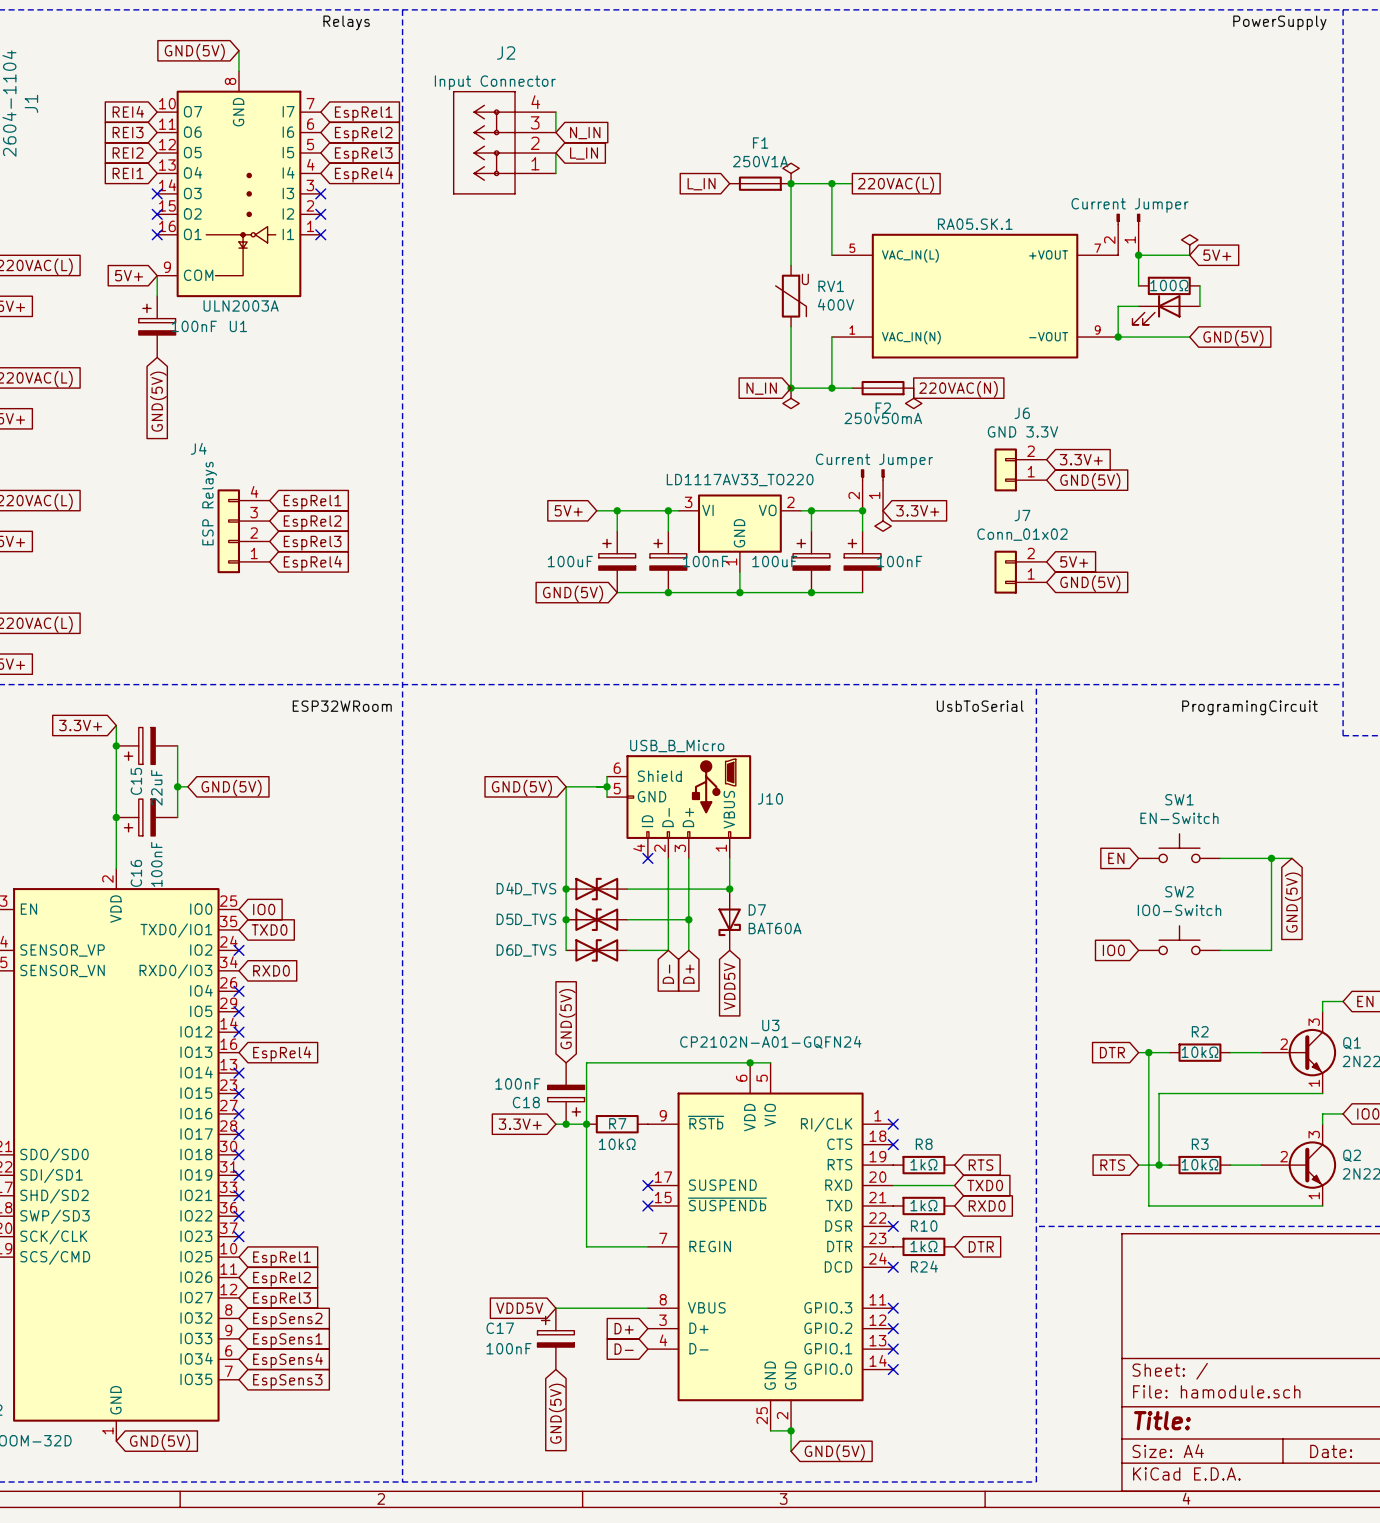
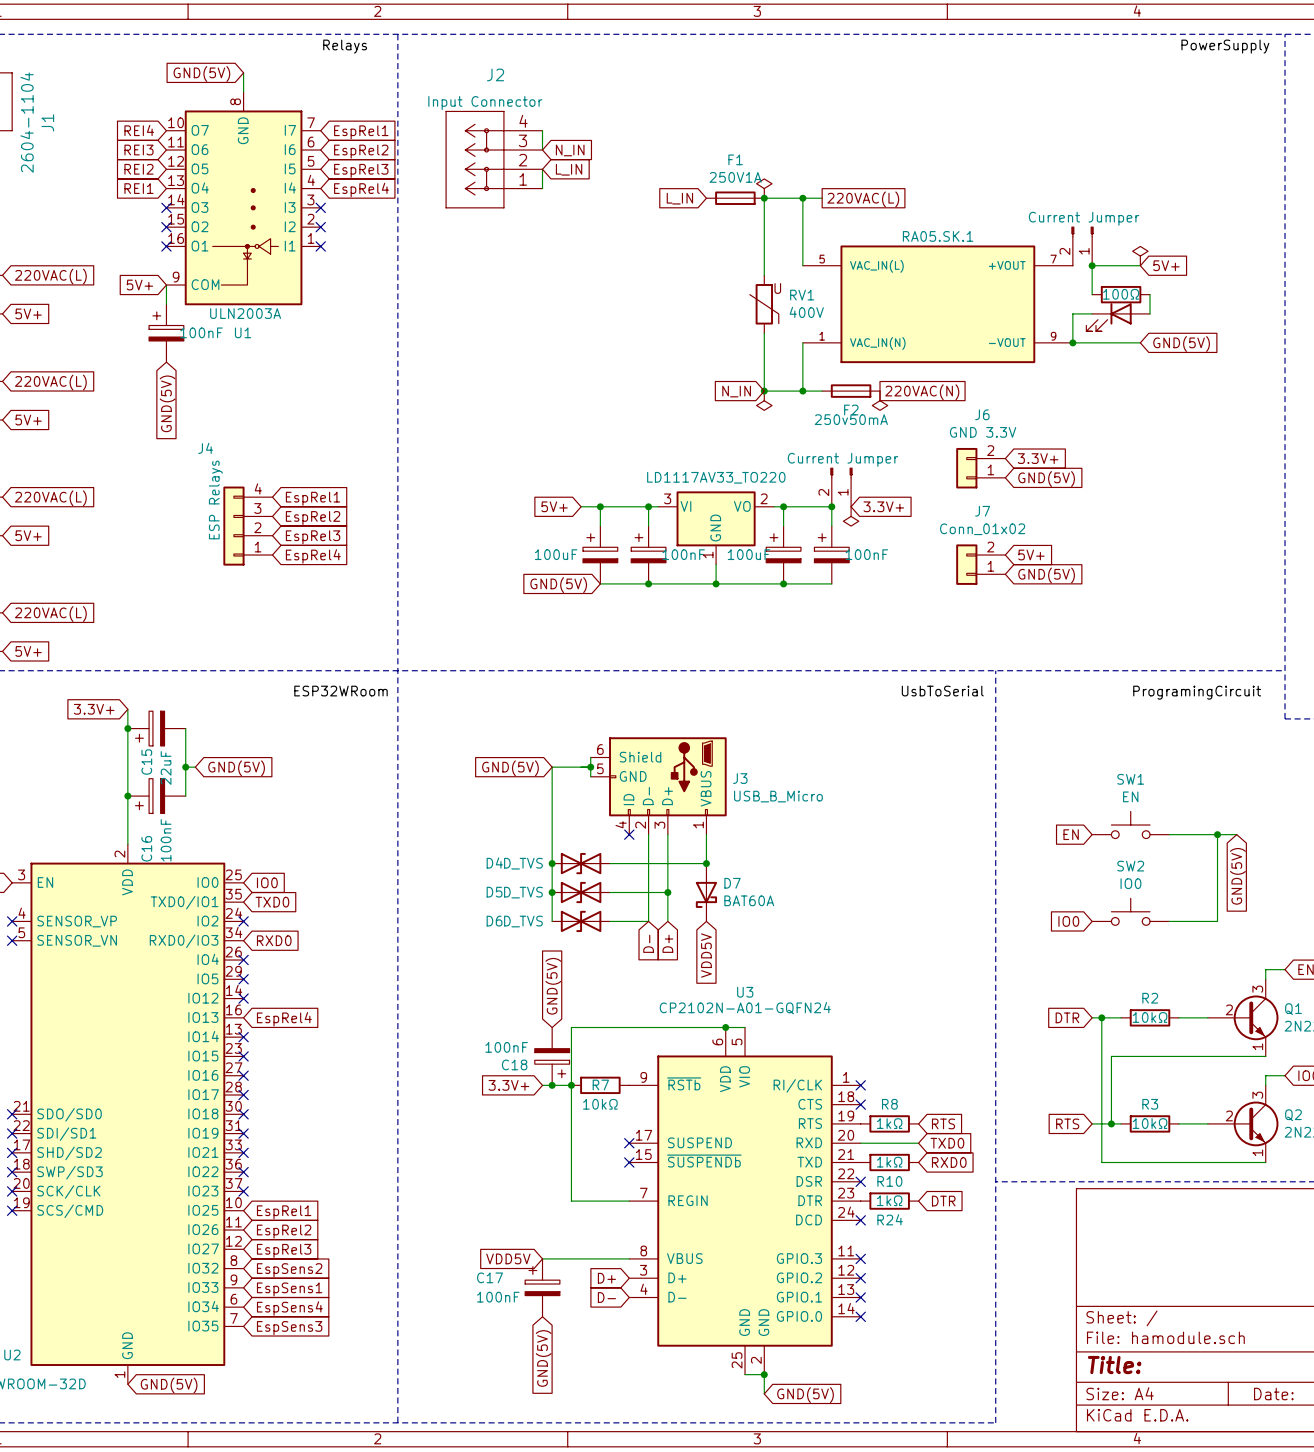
J10 value position: USB_B_Micro (677, 746) -> USB_B_Micro (778, 796)
J10 name: J10 (770, 798) -> J3 (740, 778)
SW1 value: EN-Switch (1179, 818) -> EN (1130, 796)
SW2 value: IO0-Switch (1179, 910) -> IO0 (1130, 883)

